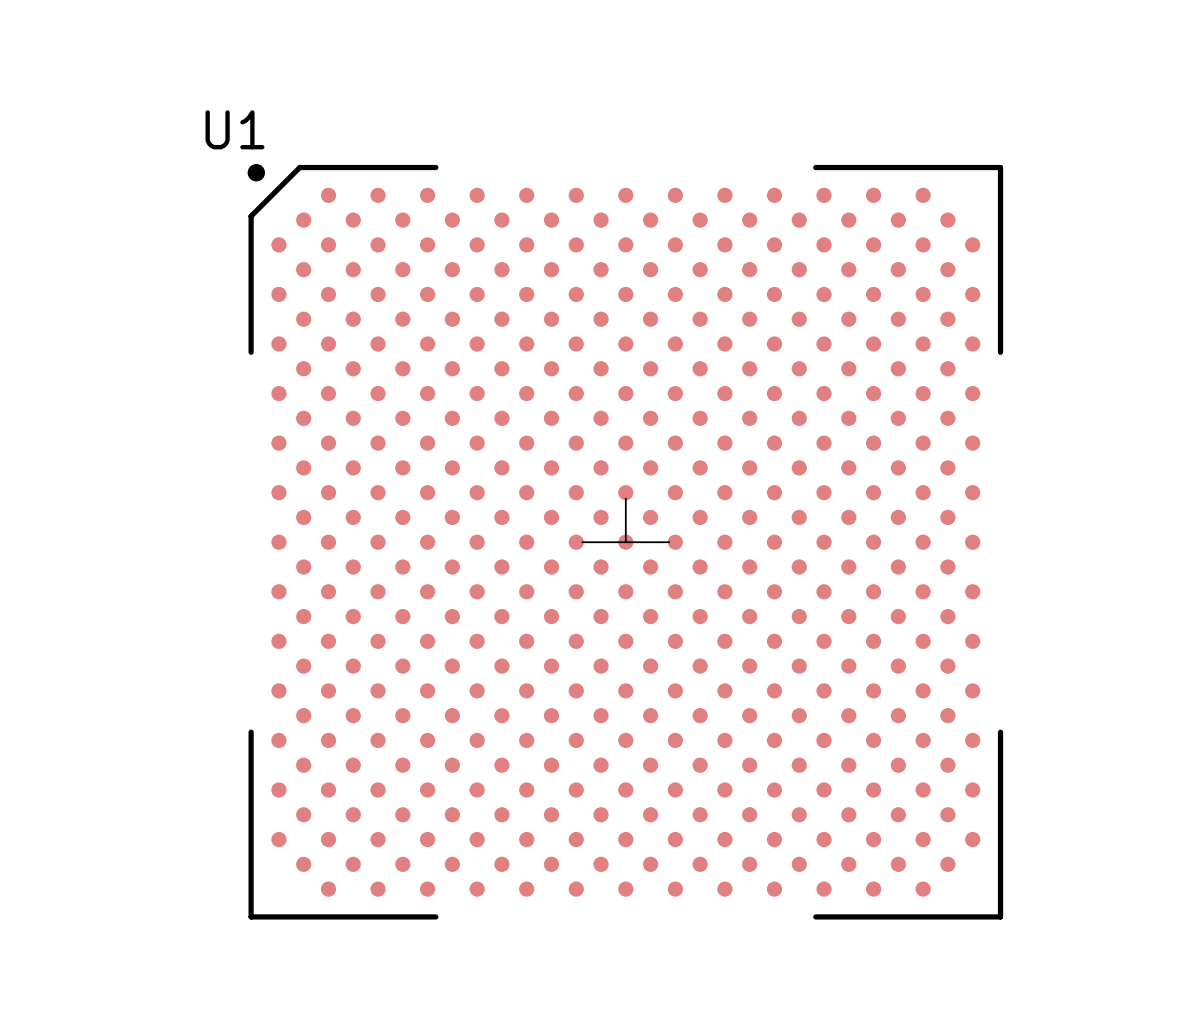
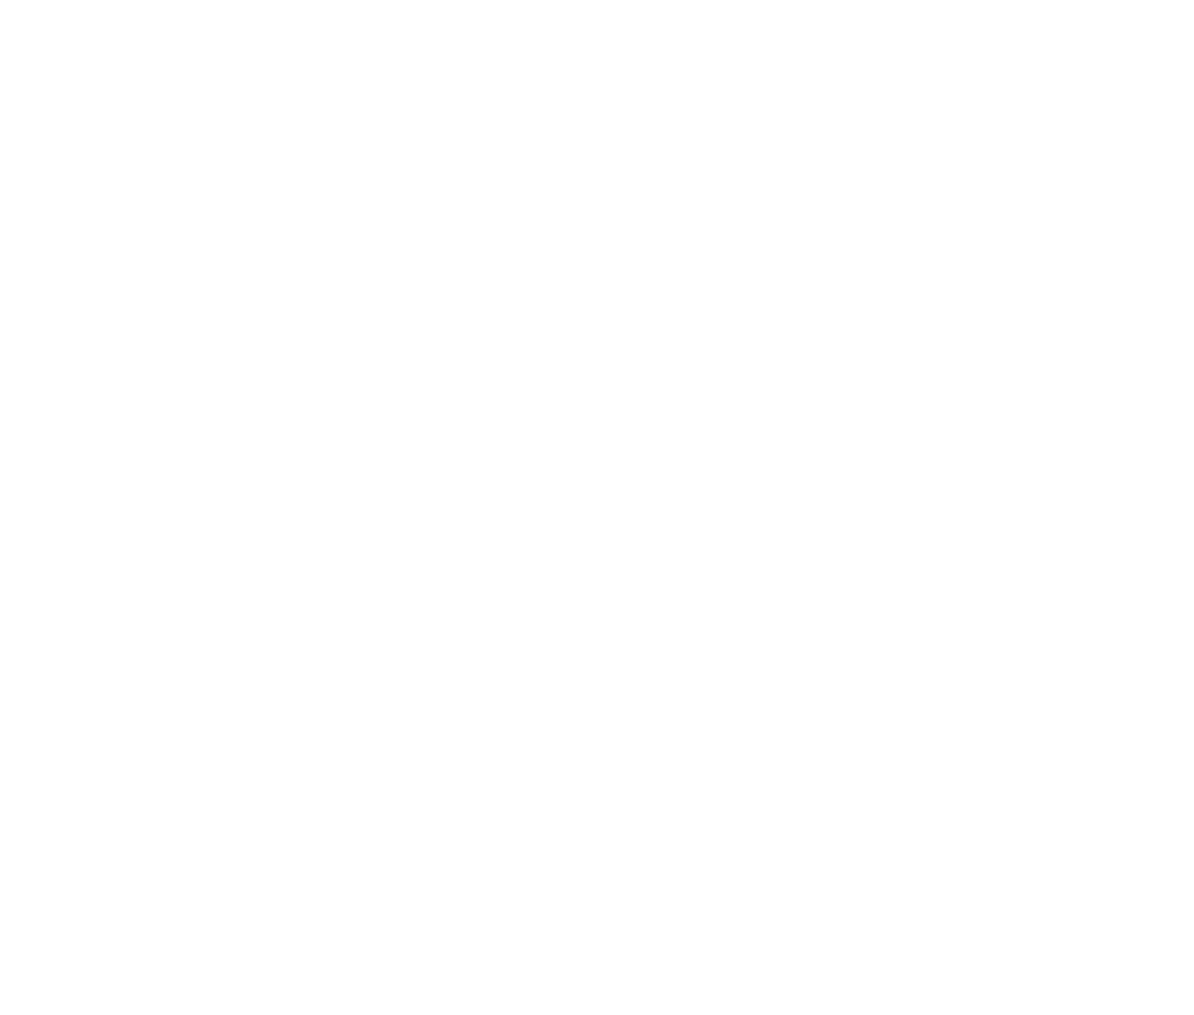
U1: (625, 541) -> none

